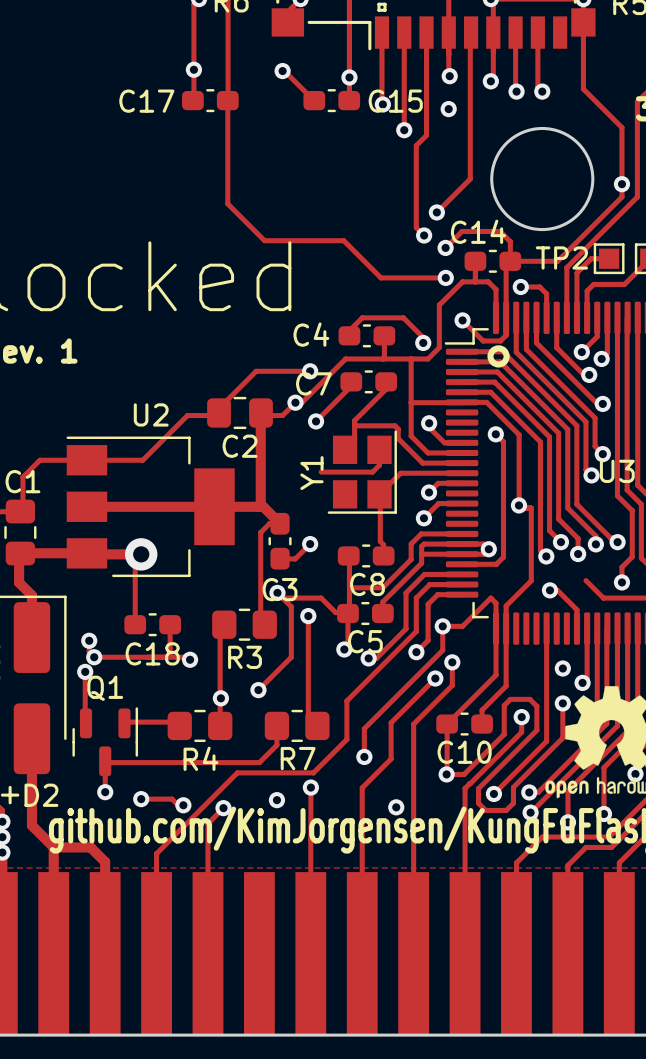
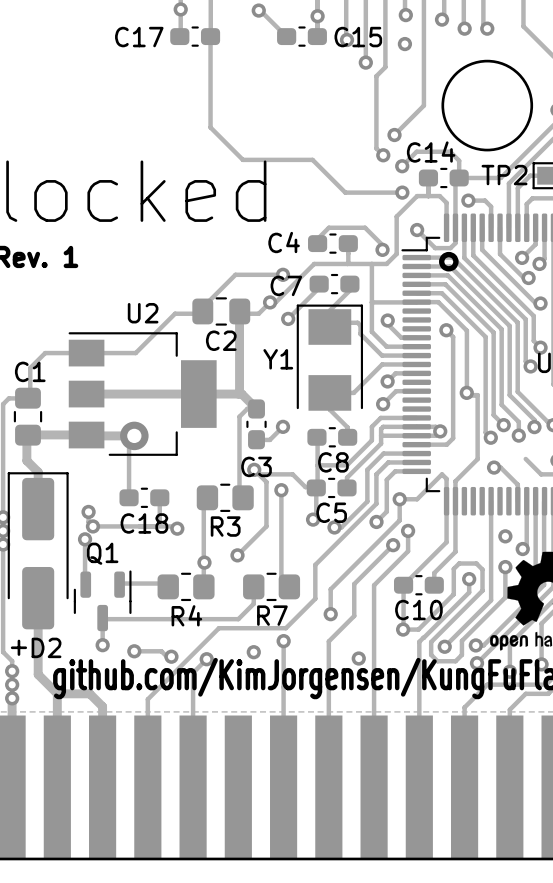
track: (363, 411) (354, 420) (354, 440) (345, 449) -> none
Y1 footprint: [327, 430, 397, 514] -> [296, 304, 364, 411]
track: (379, 449) (379, 465) (372, 472) (321, 472) -> none
track: (422, 473) (400, 473) (380, 493) (380, 541) -> (382, 364) (353, 392) (329, 392) (329, 409) (344, 424)

